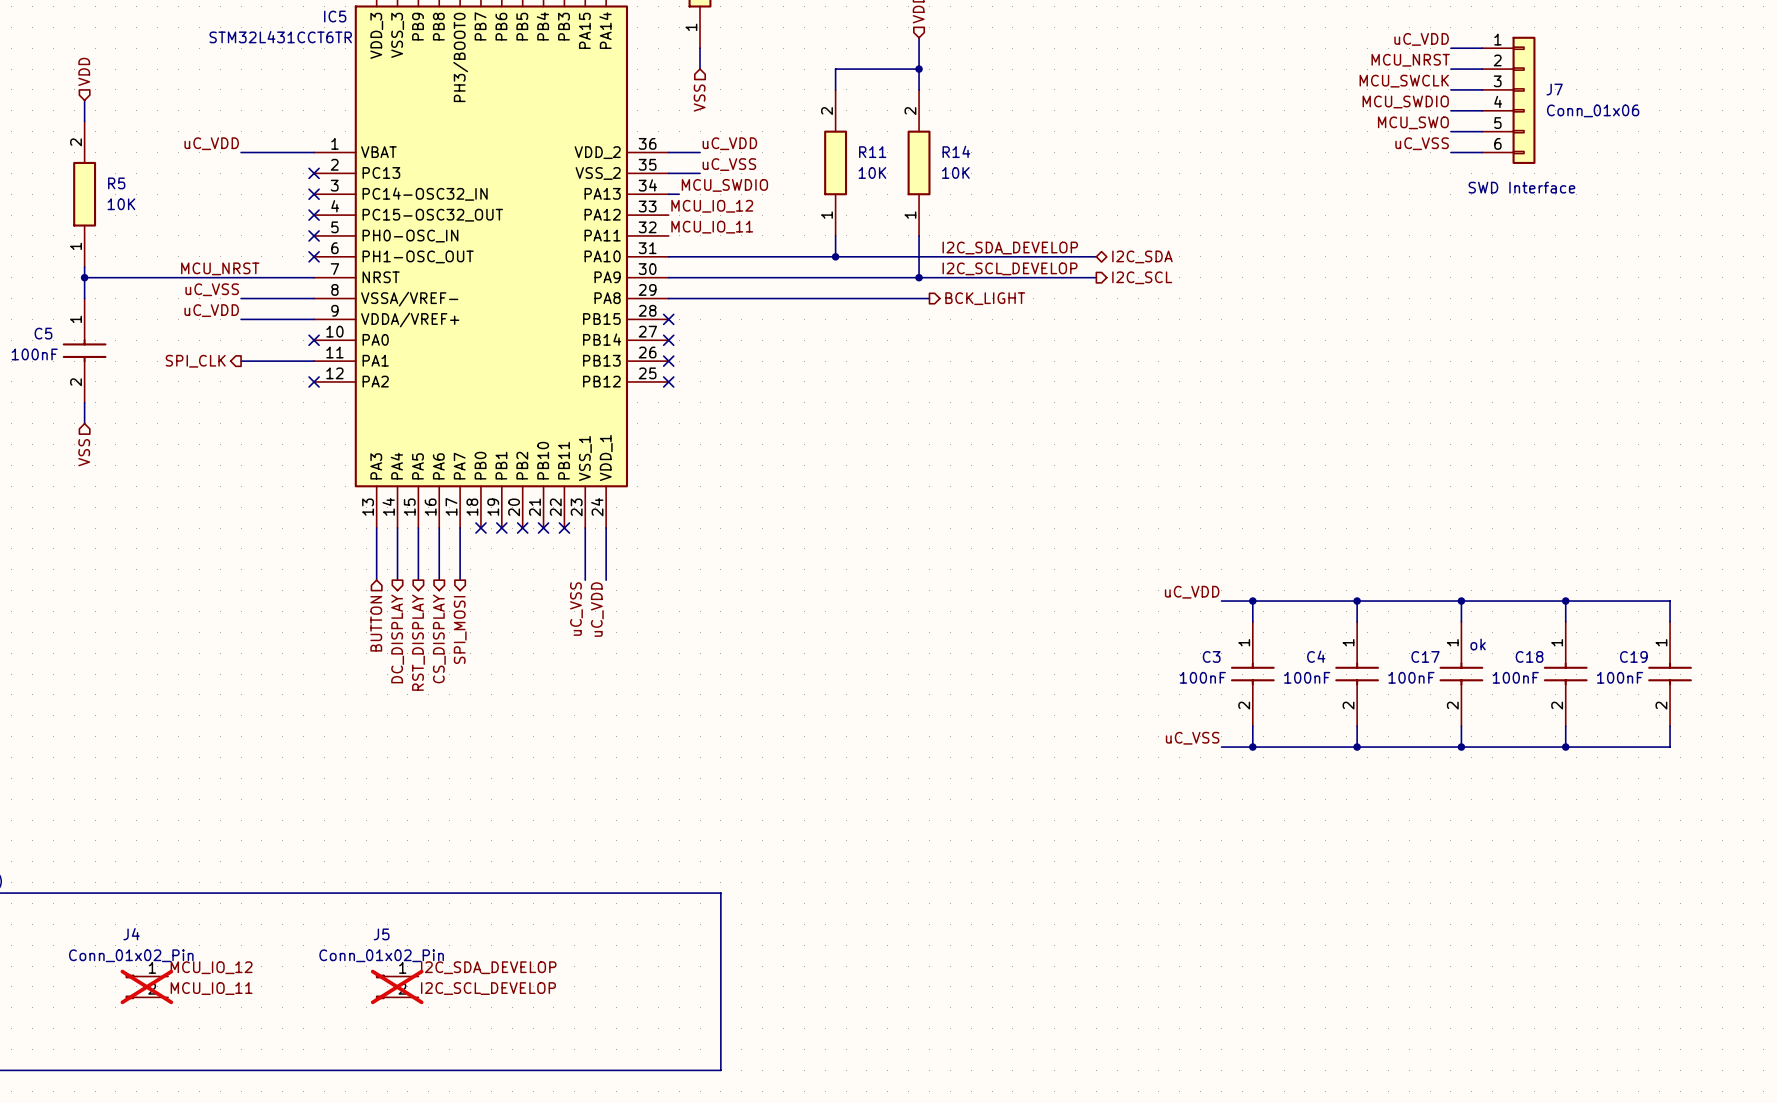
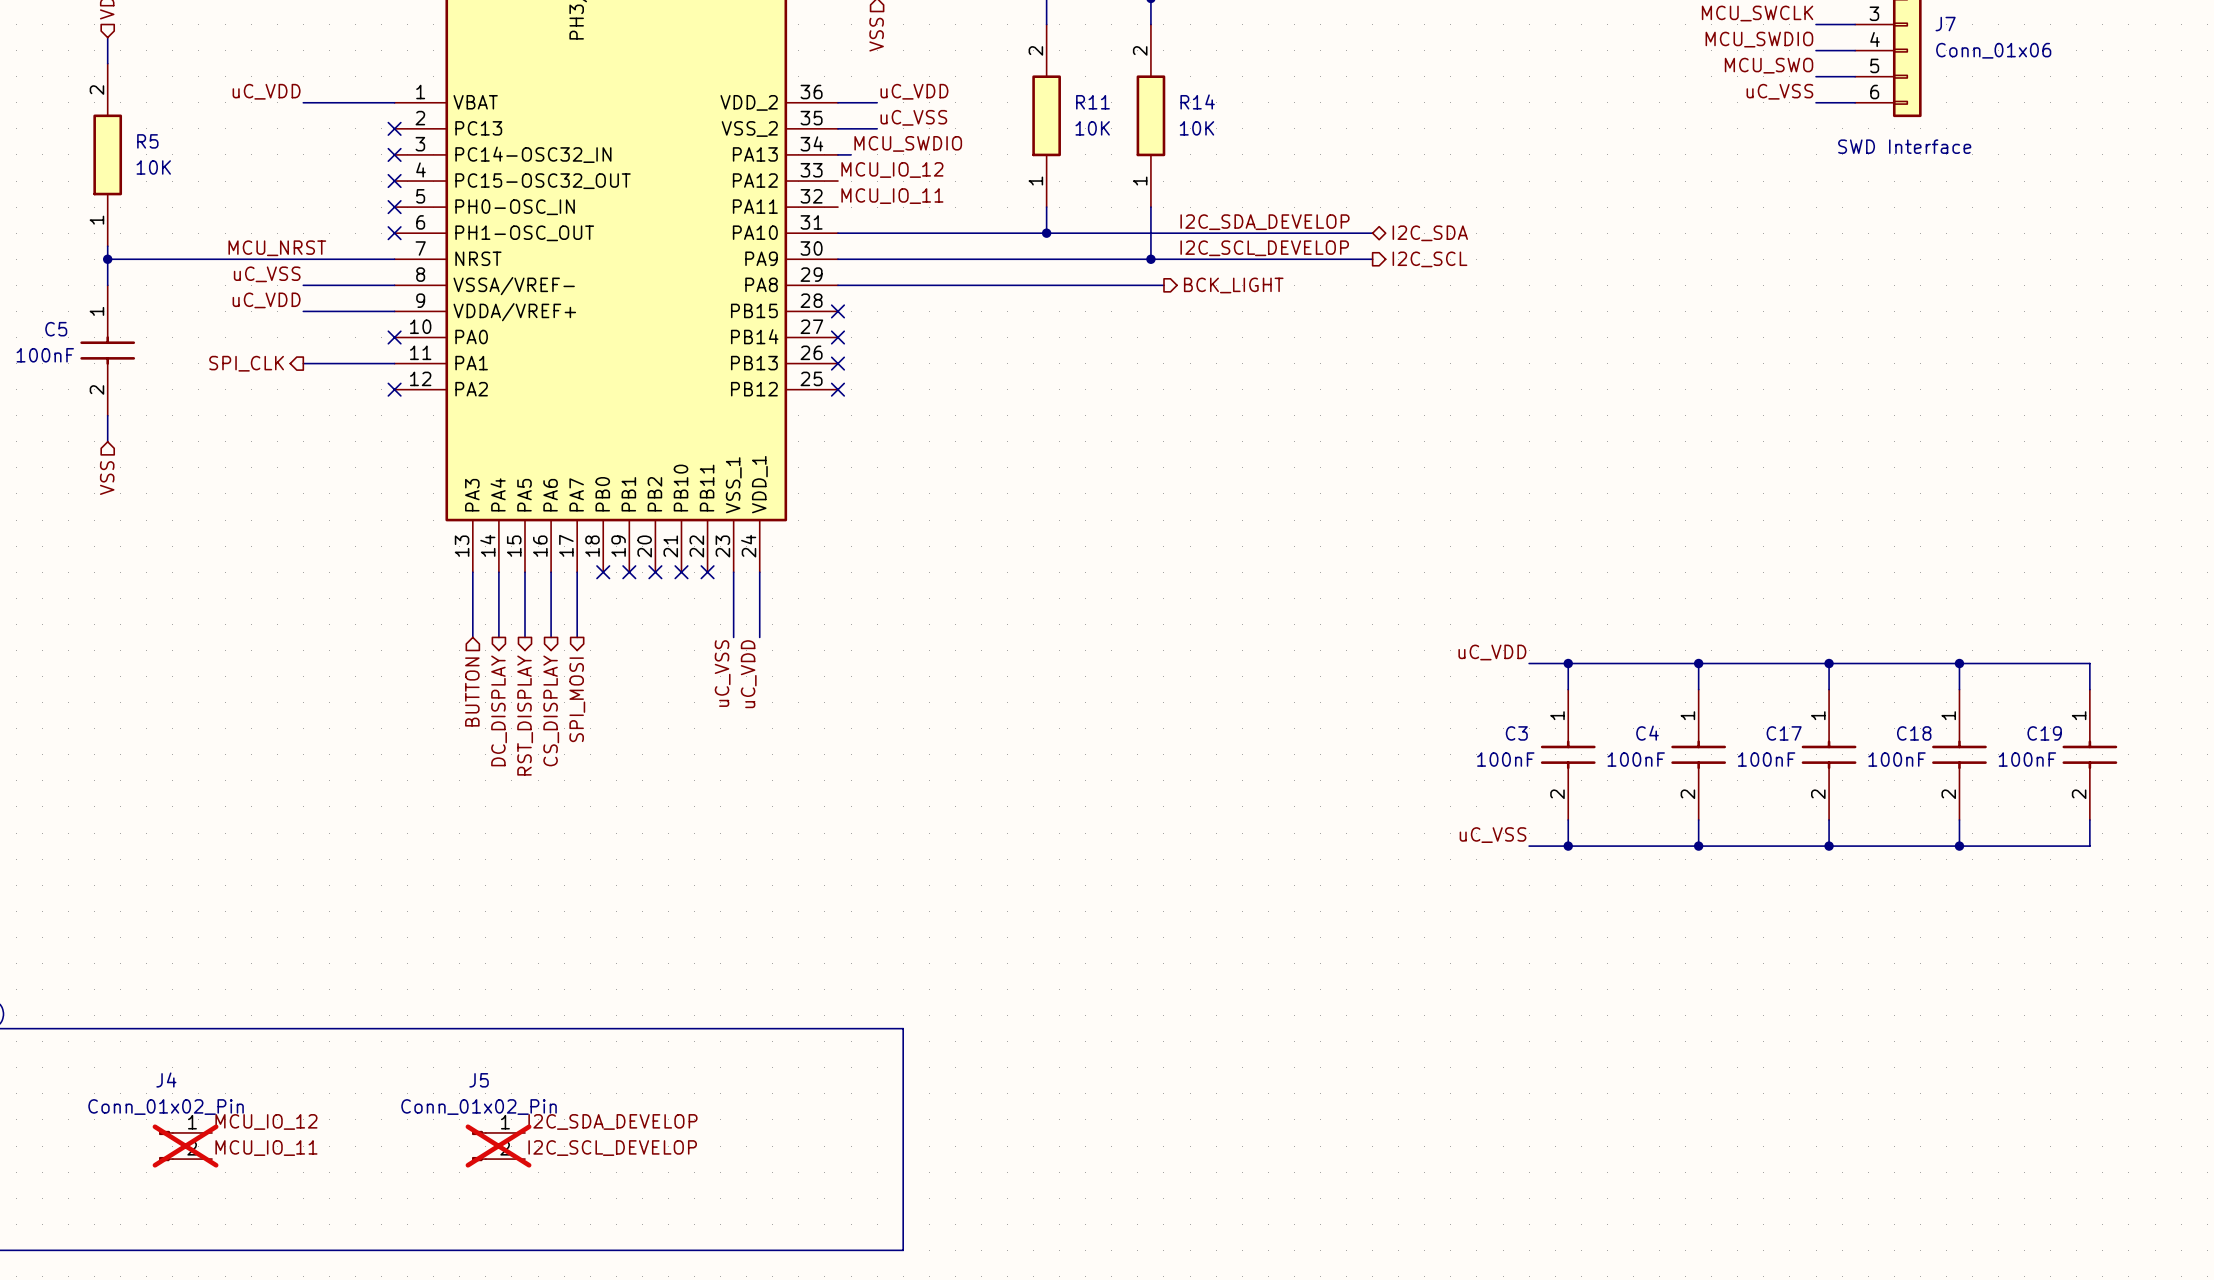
text: ok (1478, 644) -> none

